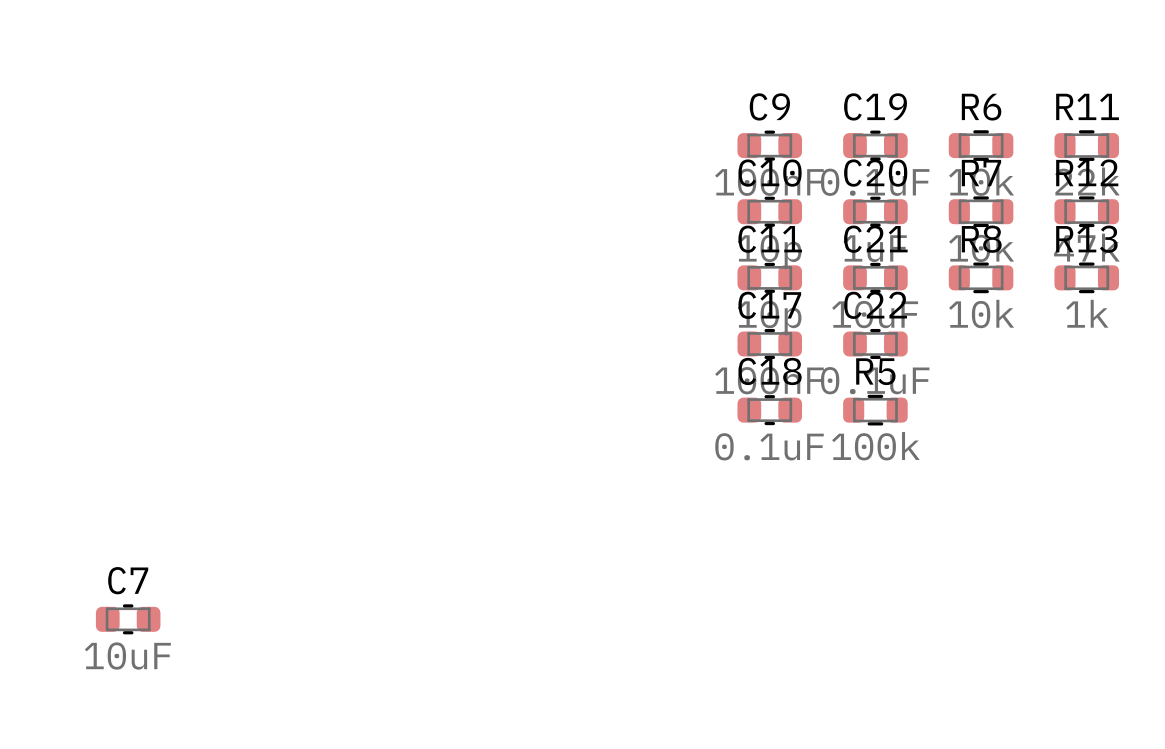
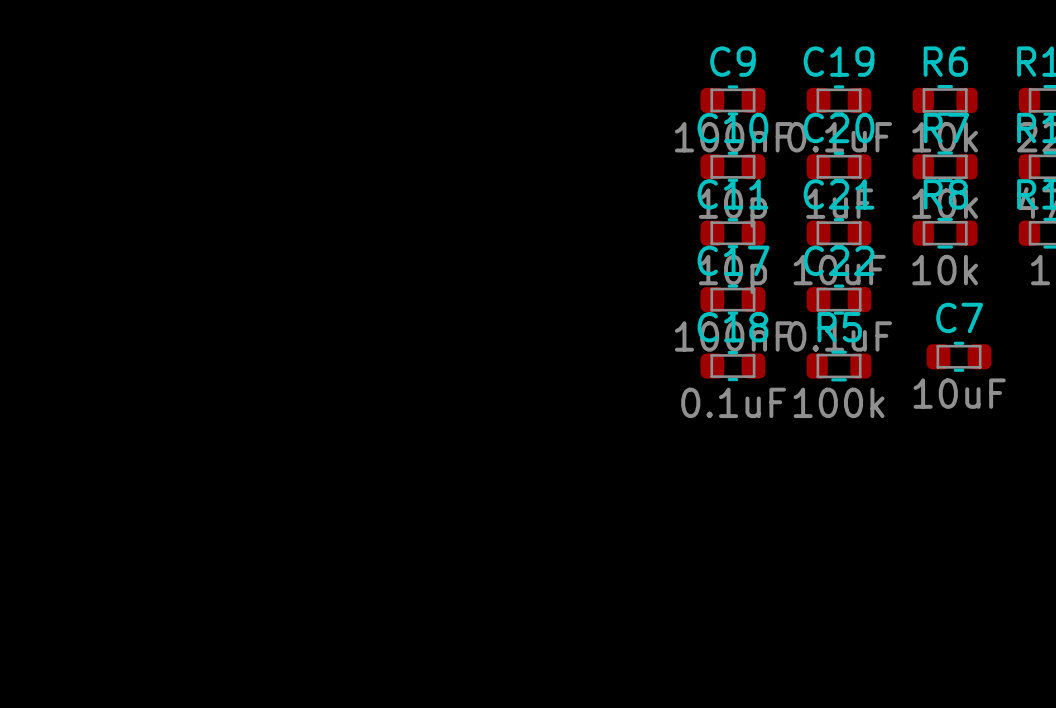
C7 position: (128, 619) -> (959, 356)

